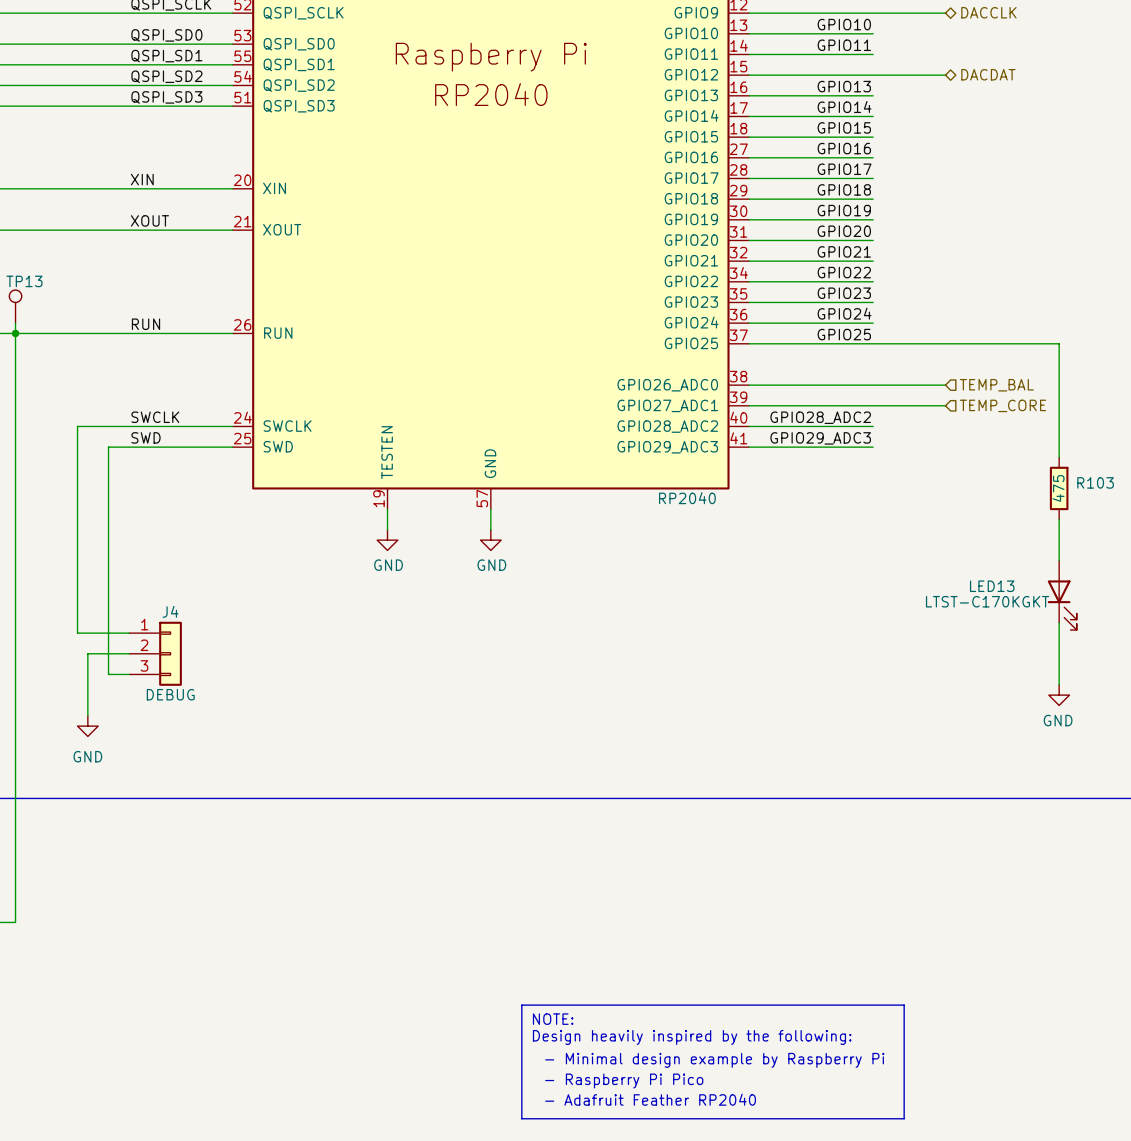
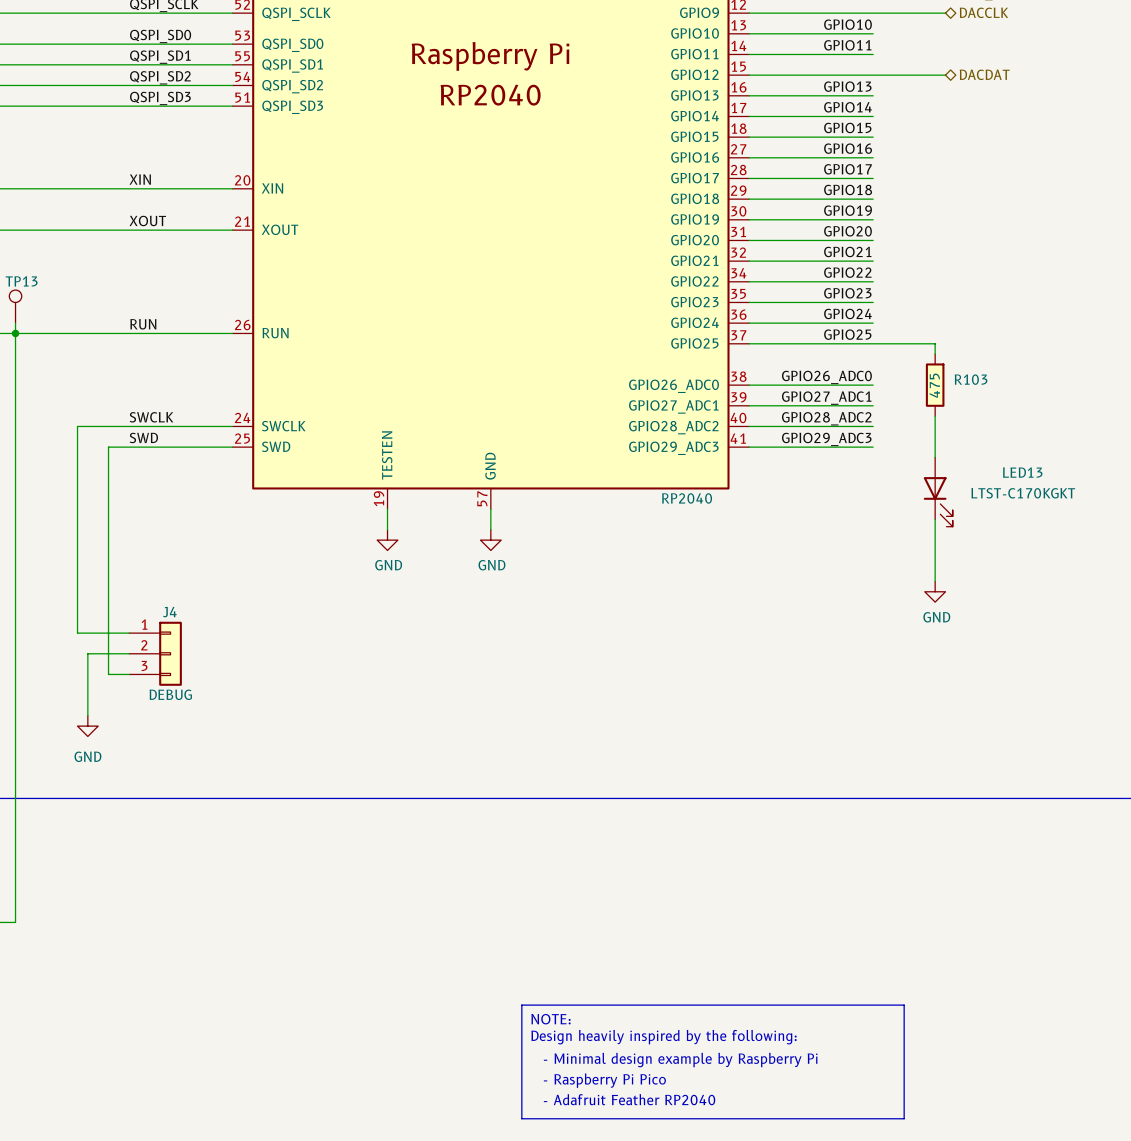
wire: (935, 343) (1059, 343) (1059, 457) -> (935, 343) (935, 354)
label: none -> GPIO26_ADC0 (826, 377)
wire: (873, 385) (945, 385) -> none
hierarchical label: TEMP_BAL (996, 385) -> none
label: none -> GPIO27_ADC1 (826, 398)
wire: (873, 405) (945, 405) -> none
hierarchical label: TEMP_CORE (1002, 405) -> none
R103 position: (1059, 488) -> (935, 385)
wire: (1059, 519) (1059, 560) -> (935, 416) (935, 457)
LED13 name position: LED13 (992, 586) -> LED13 (1022, 472)
LED13 position: (1062, 595) -> (938, 492)
LED13 value position: LTST-C170KGKT (987, 601) -> LTST-C170KGKT (1023, 493)
wire: (1059, 622) (1059, 684) -> (935, 519) (935, 581)
power symbol position: GND (1059, 695) -> GND (935, 591)

